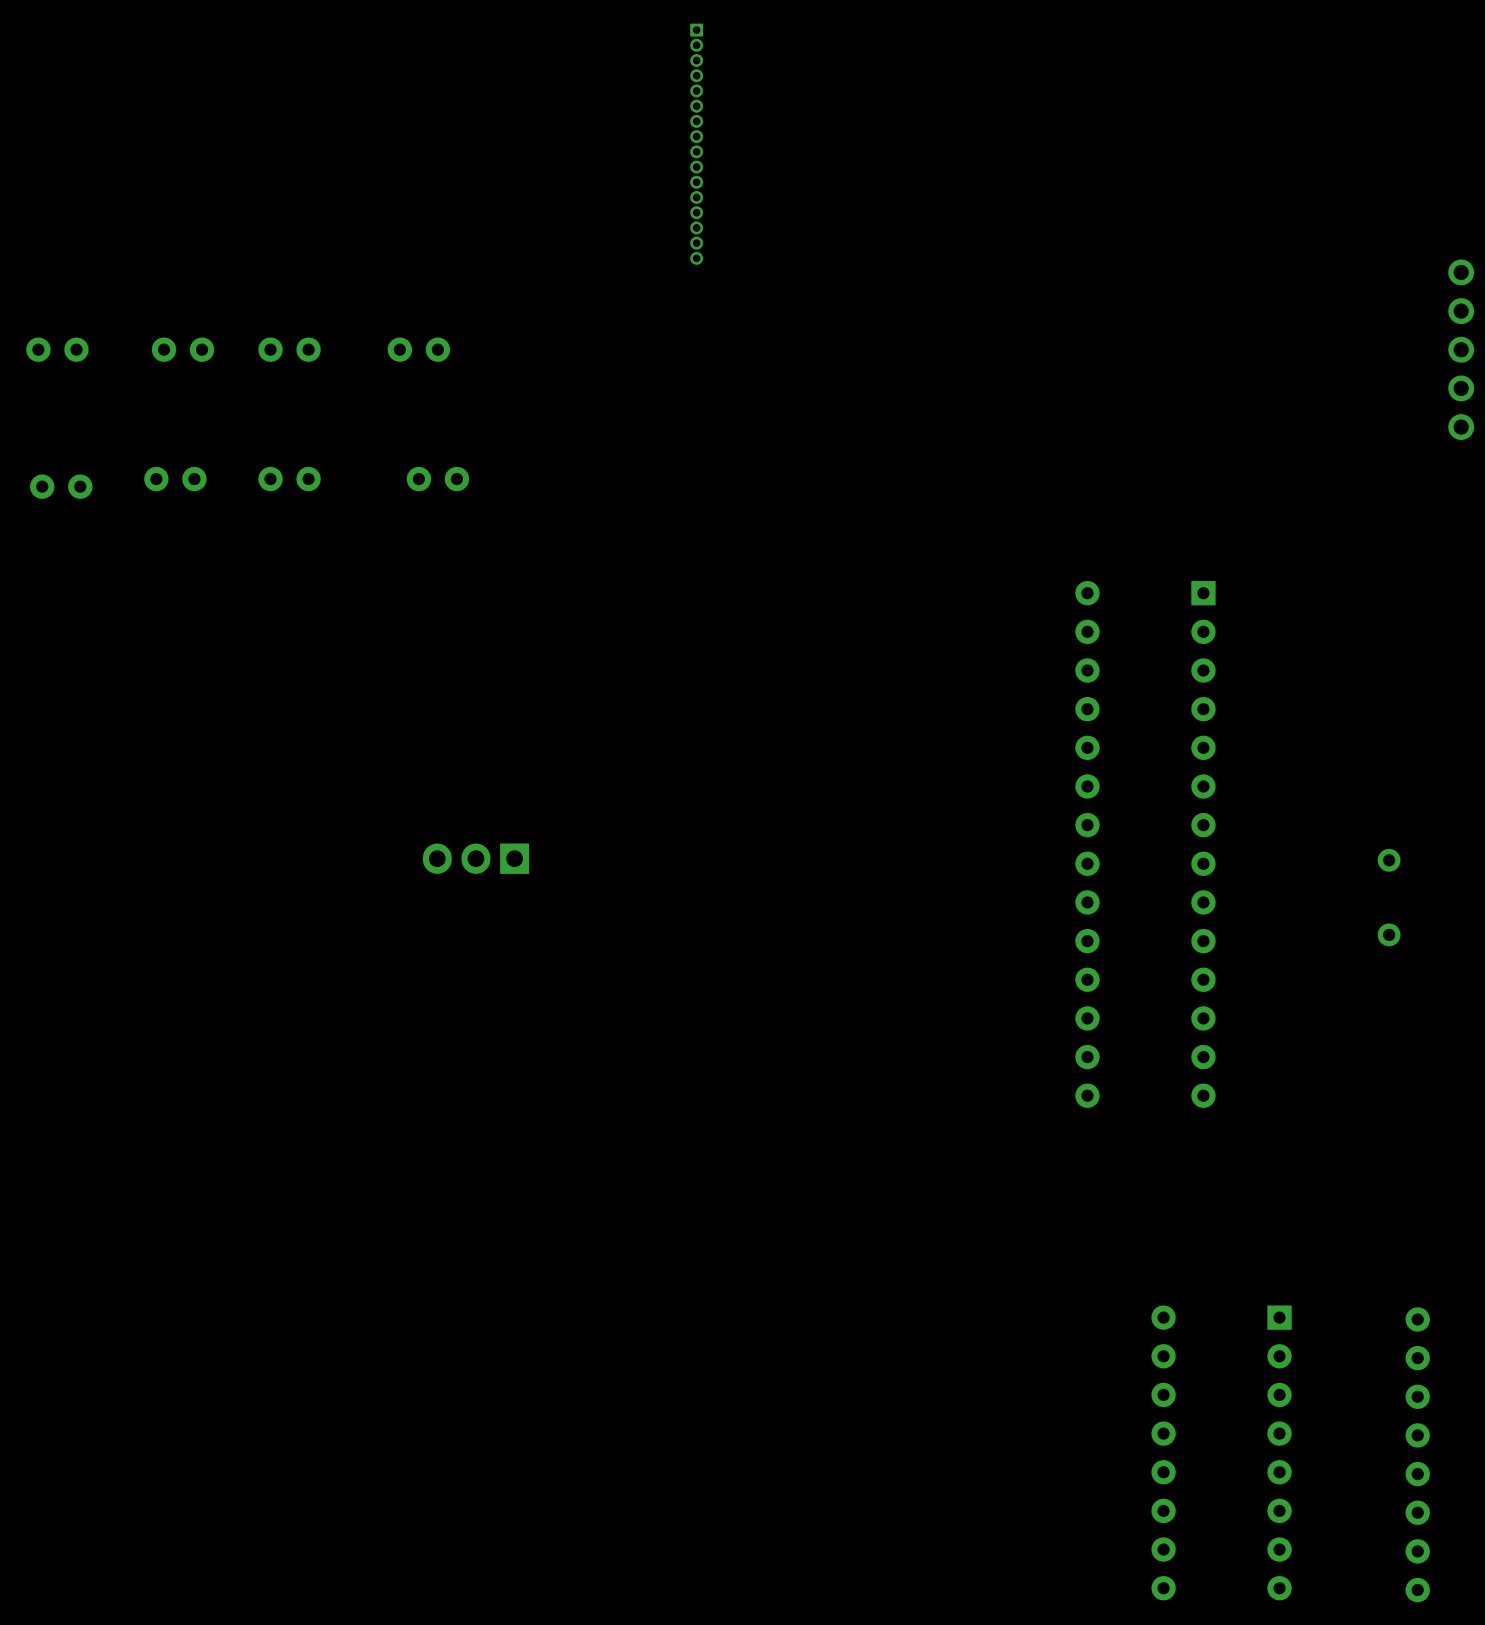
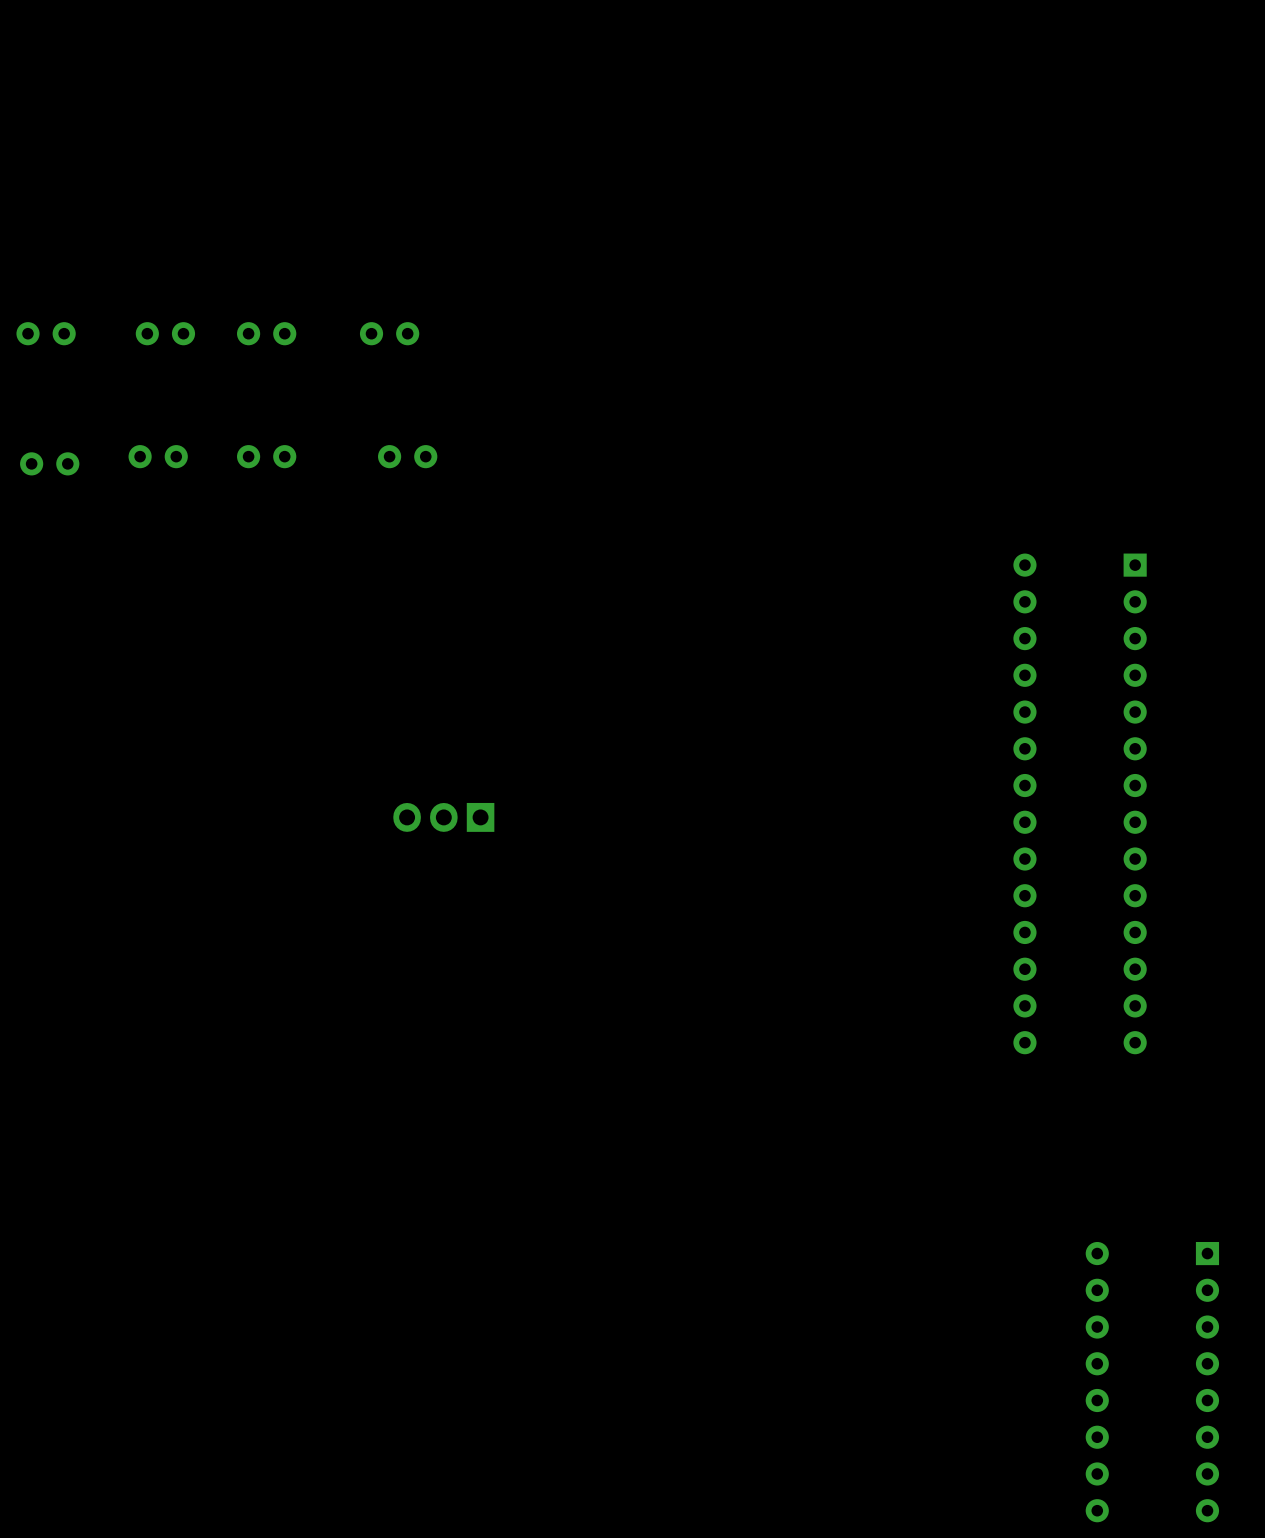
part: (696, 144) -> none

